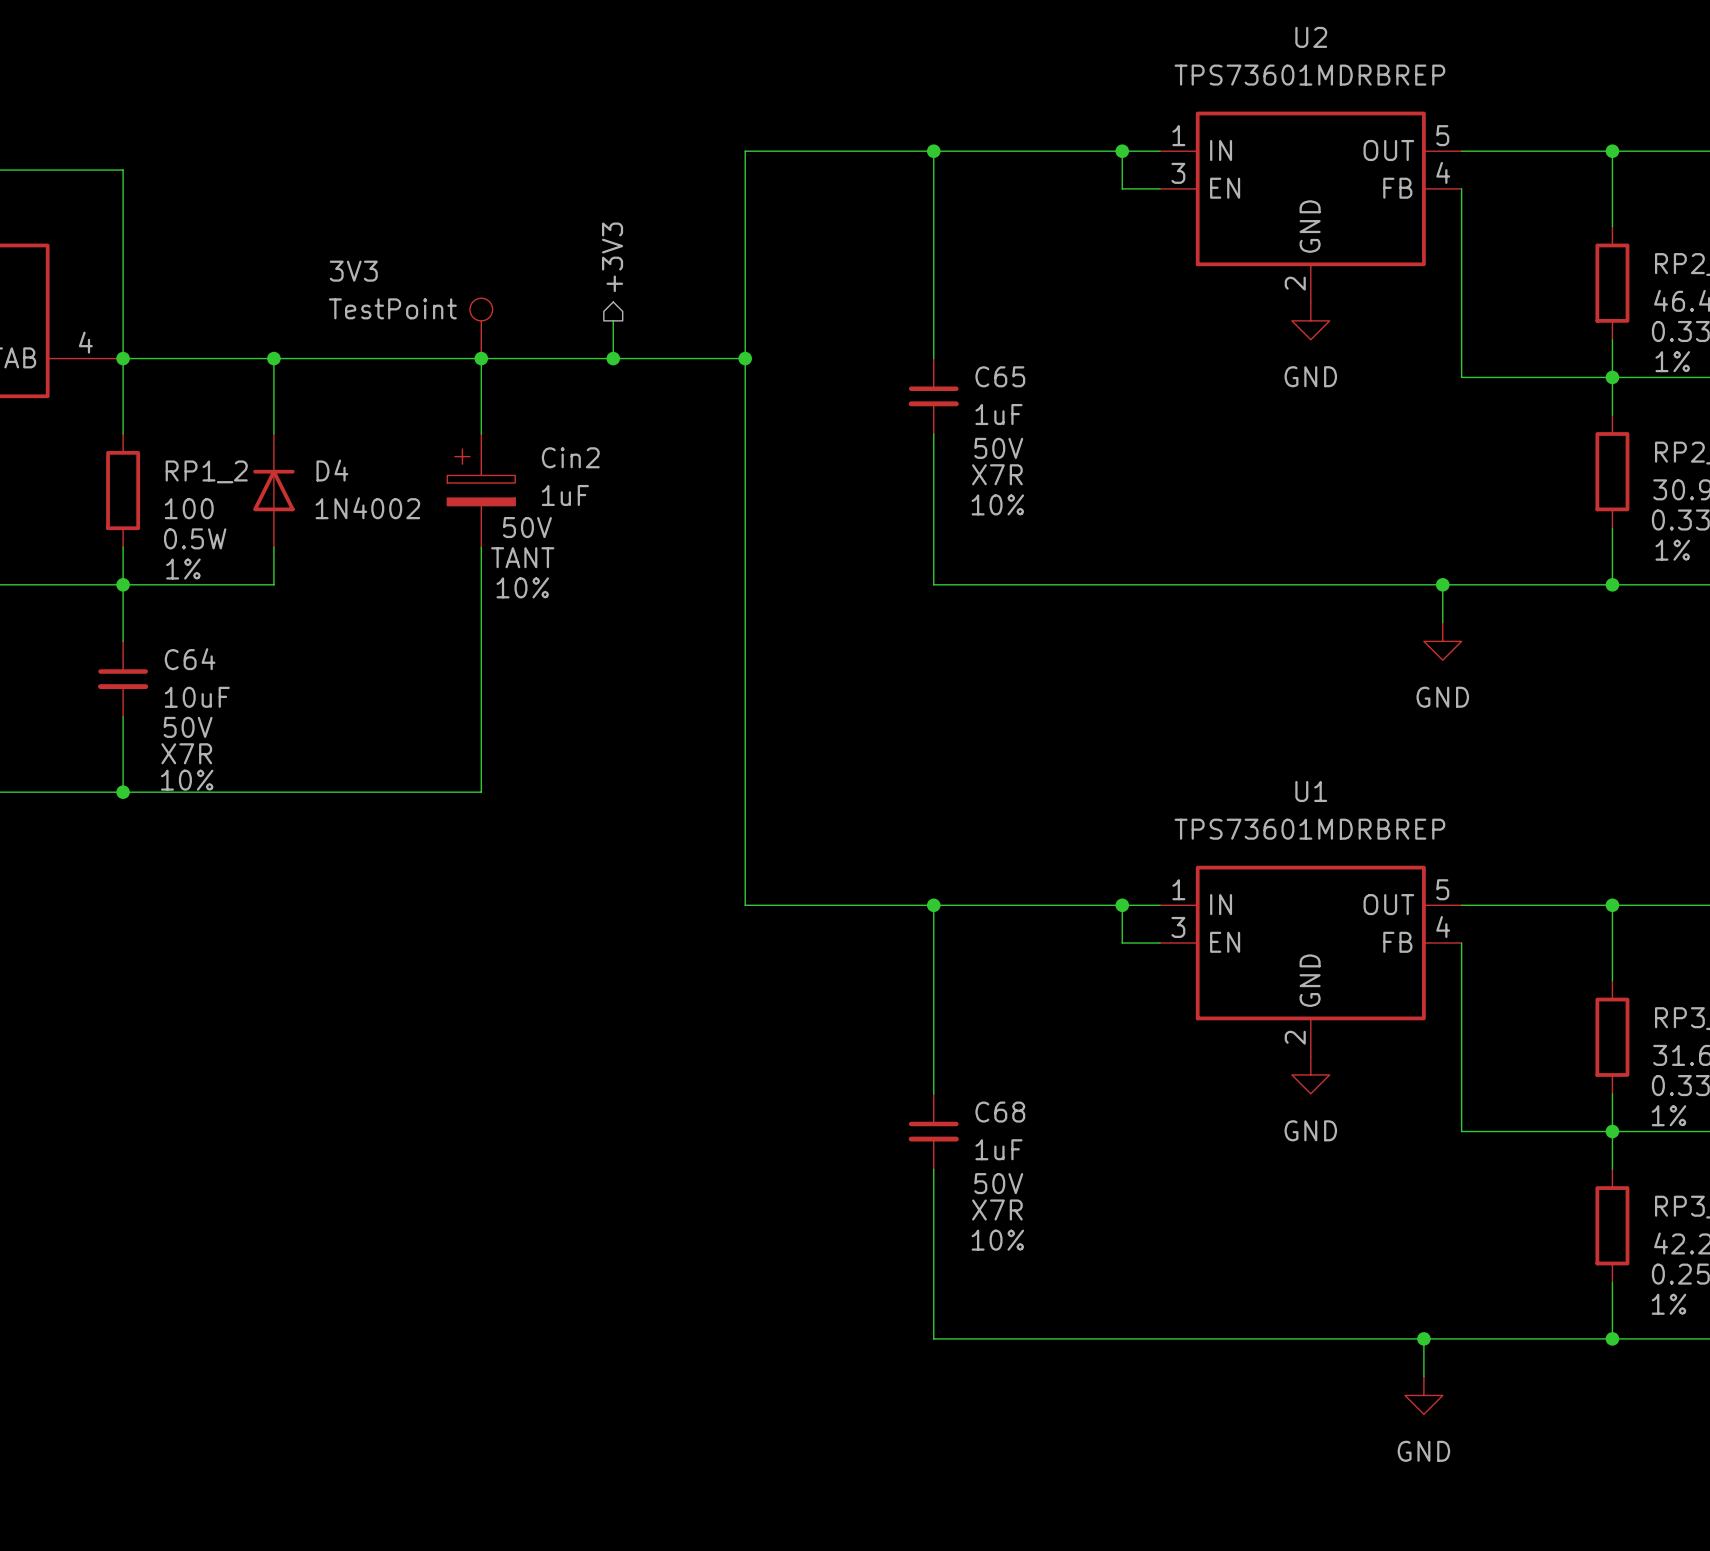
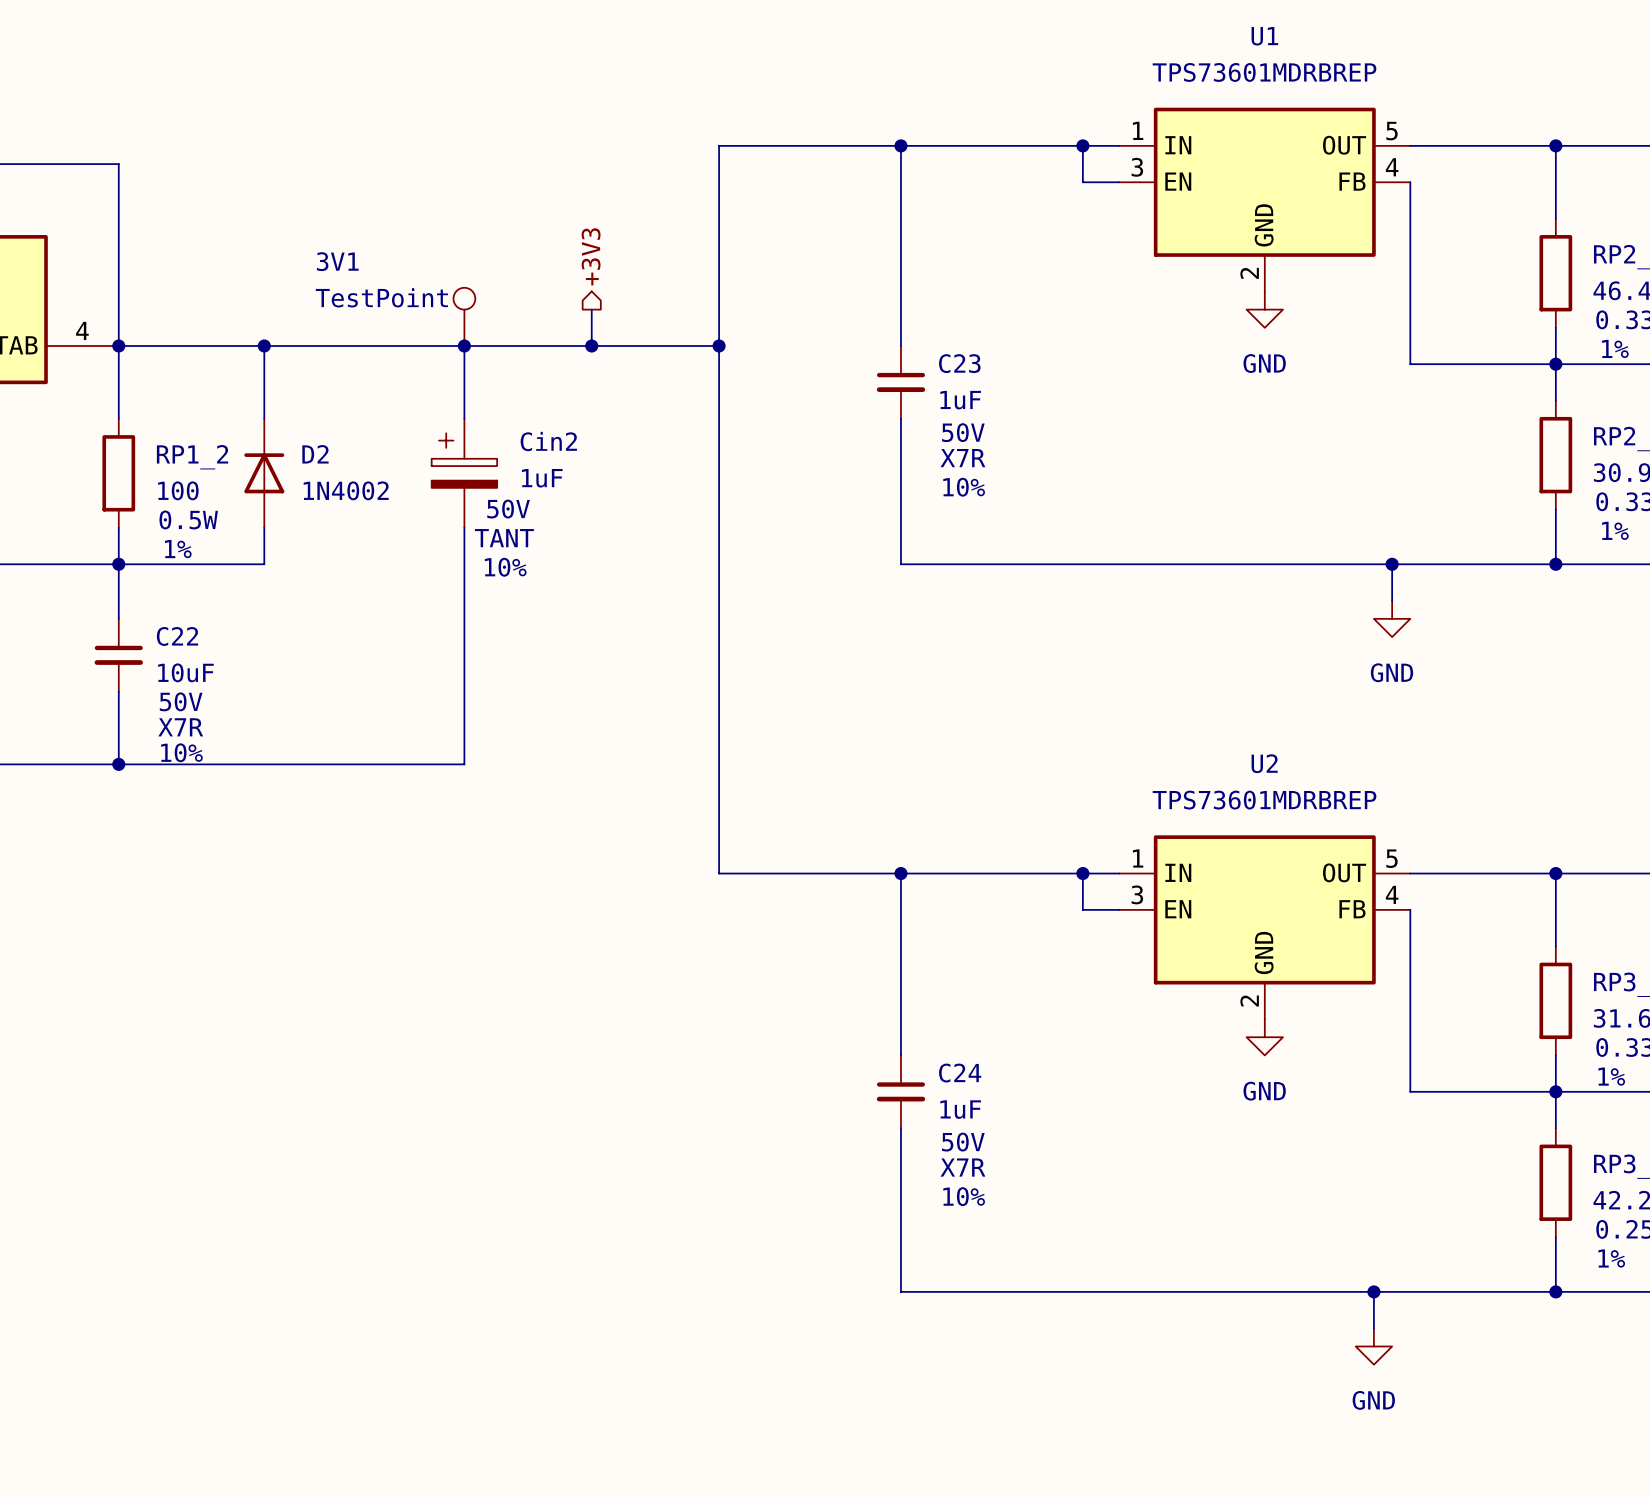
U2 name: U2 (1311, 37) -> U1 (1264, 36)
3V3 name: 3V3 (353, 271) -> 3V1 (337, 261)
C65 name: C65 (1000, 376) -> C23 (959, 363)
D4 name: D4 (332, 470) -> D2 (315, 454)
C64 name: C64 (190, 659) -> C22 (177, 636)
U1 name: U1 (1311, 791) -> U2 (1264, 763)
C68 name: C68 (1000, 1112) -> C24 (960, 1073)

